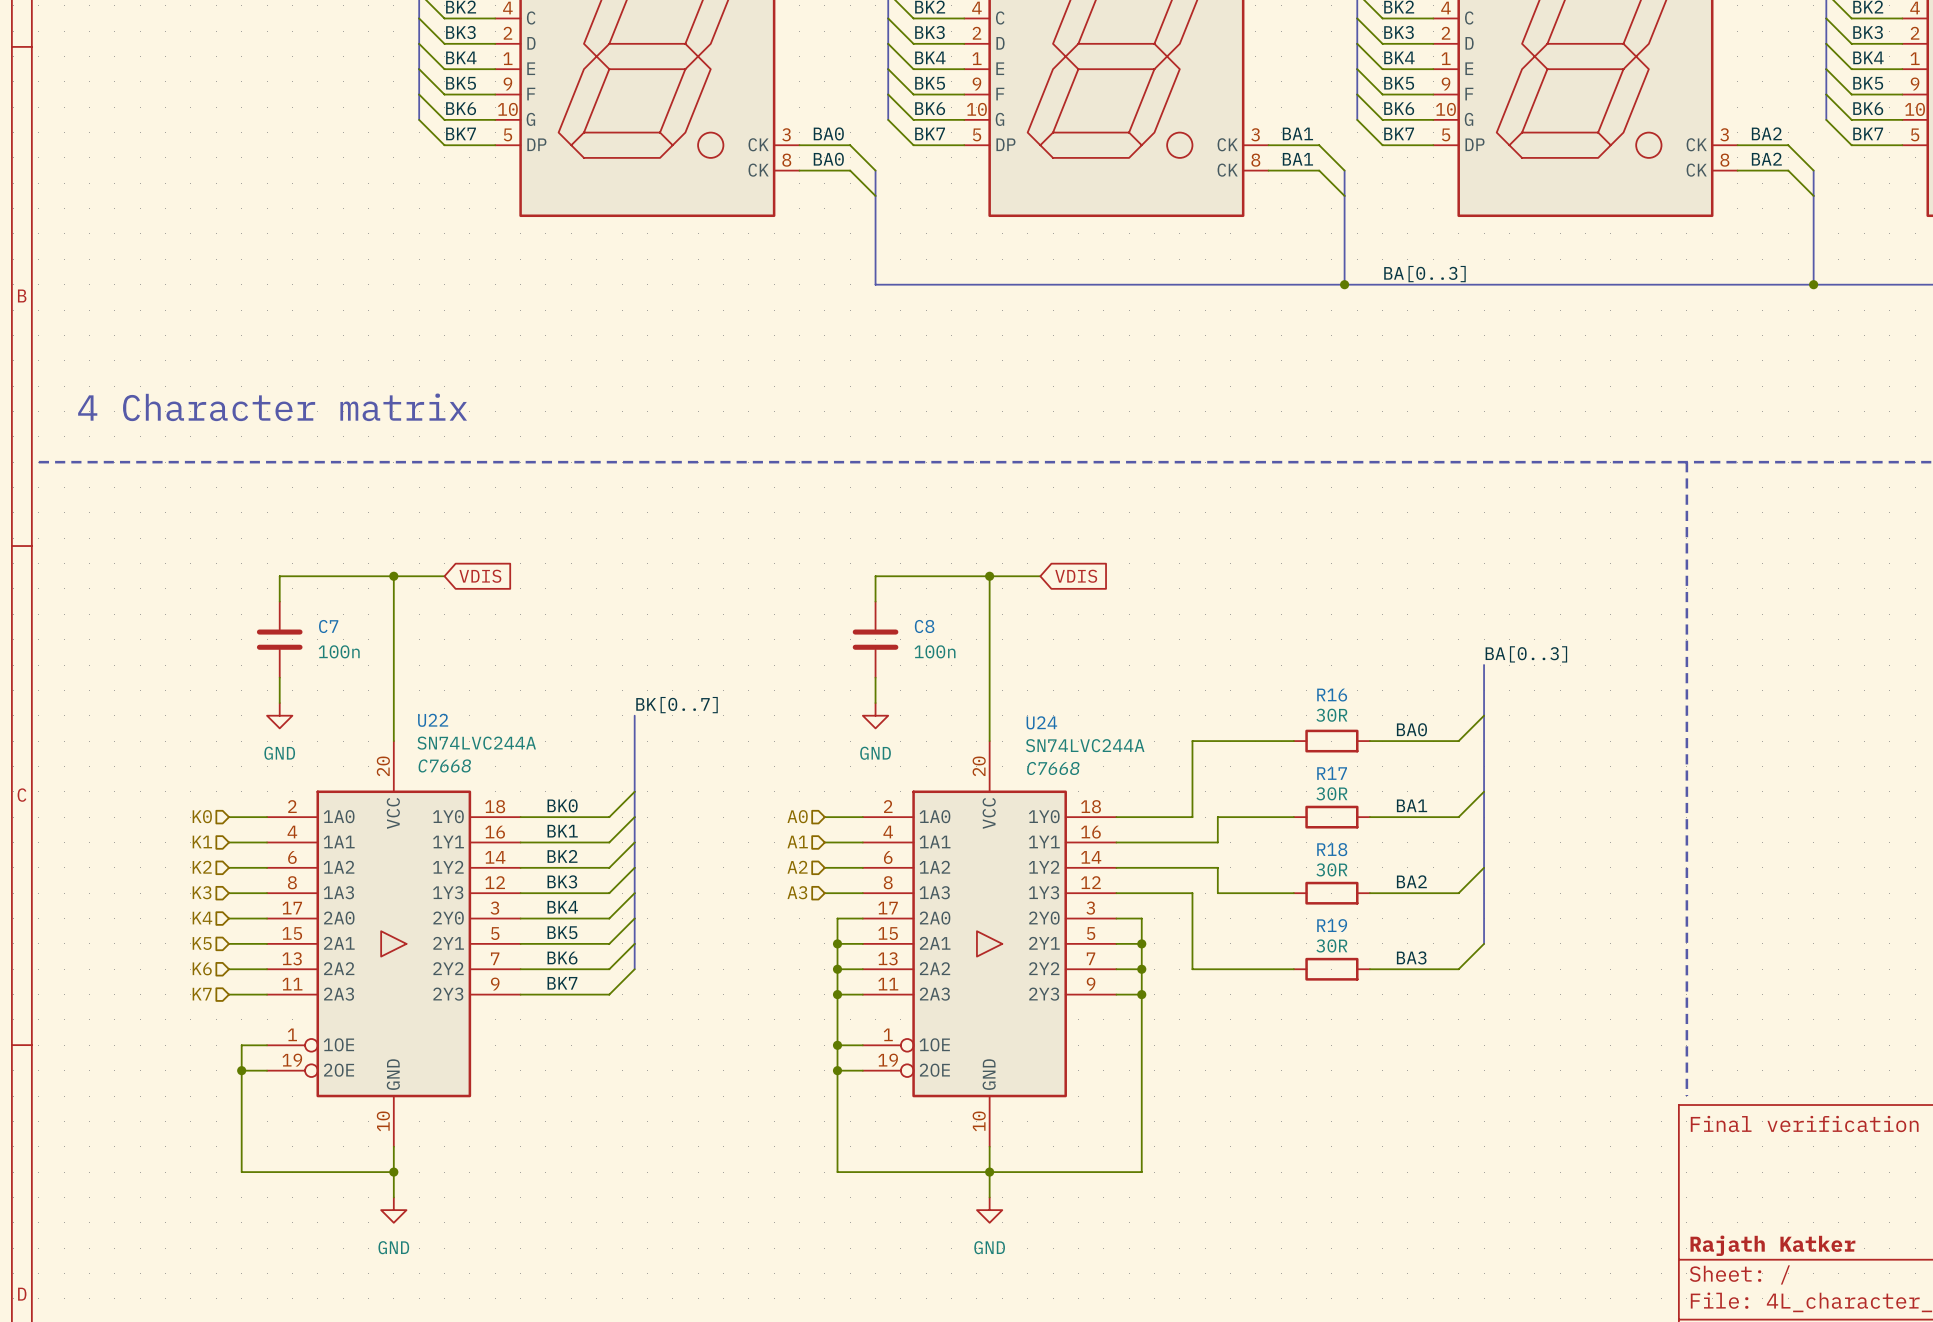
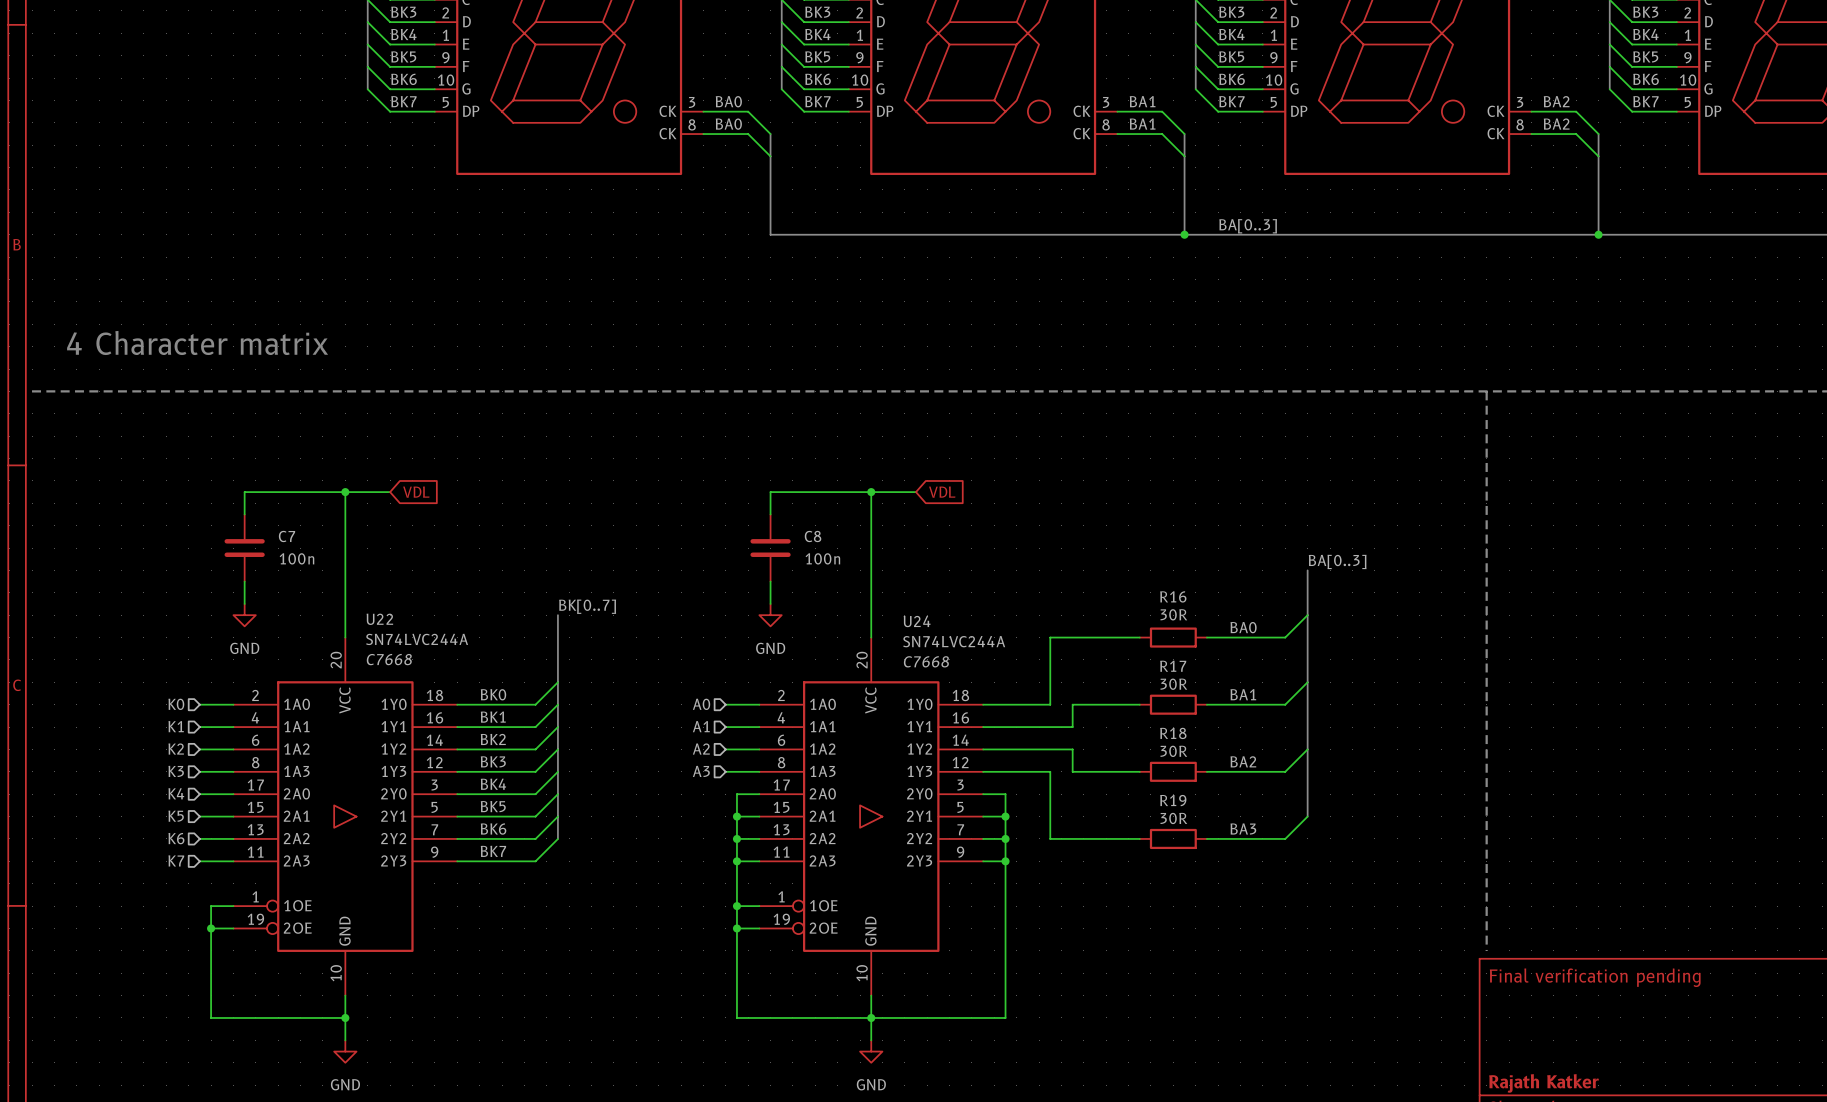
global label: VDIS (480, 576) -> VDL (416, 492)
global label: VDIS (1076, 576) -> VDL (942, 492)

